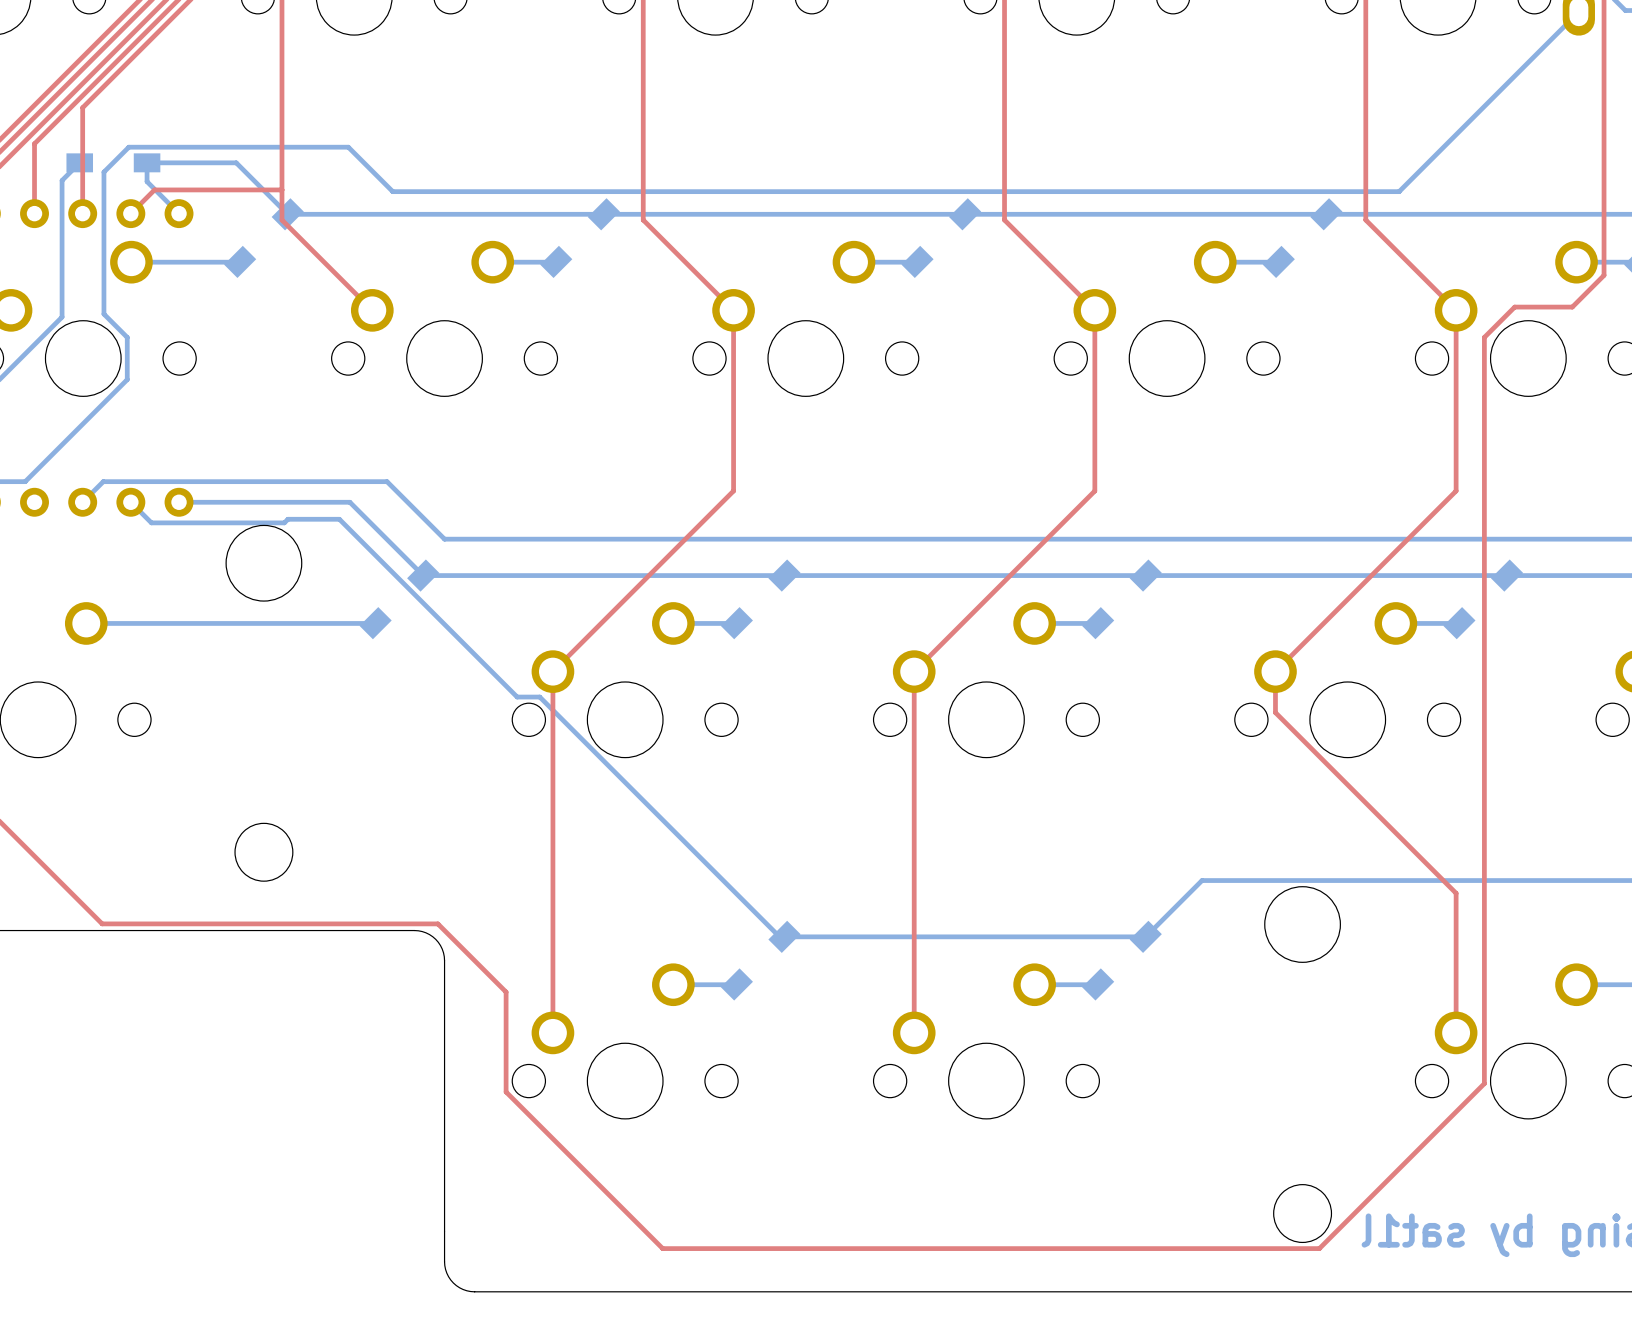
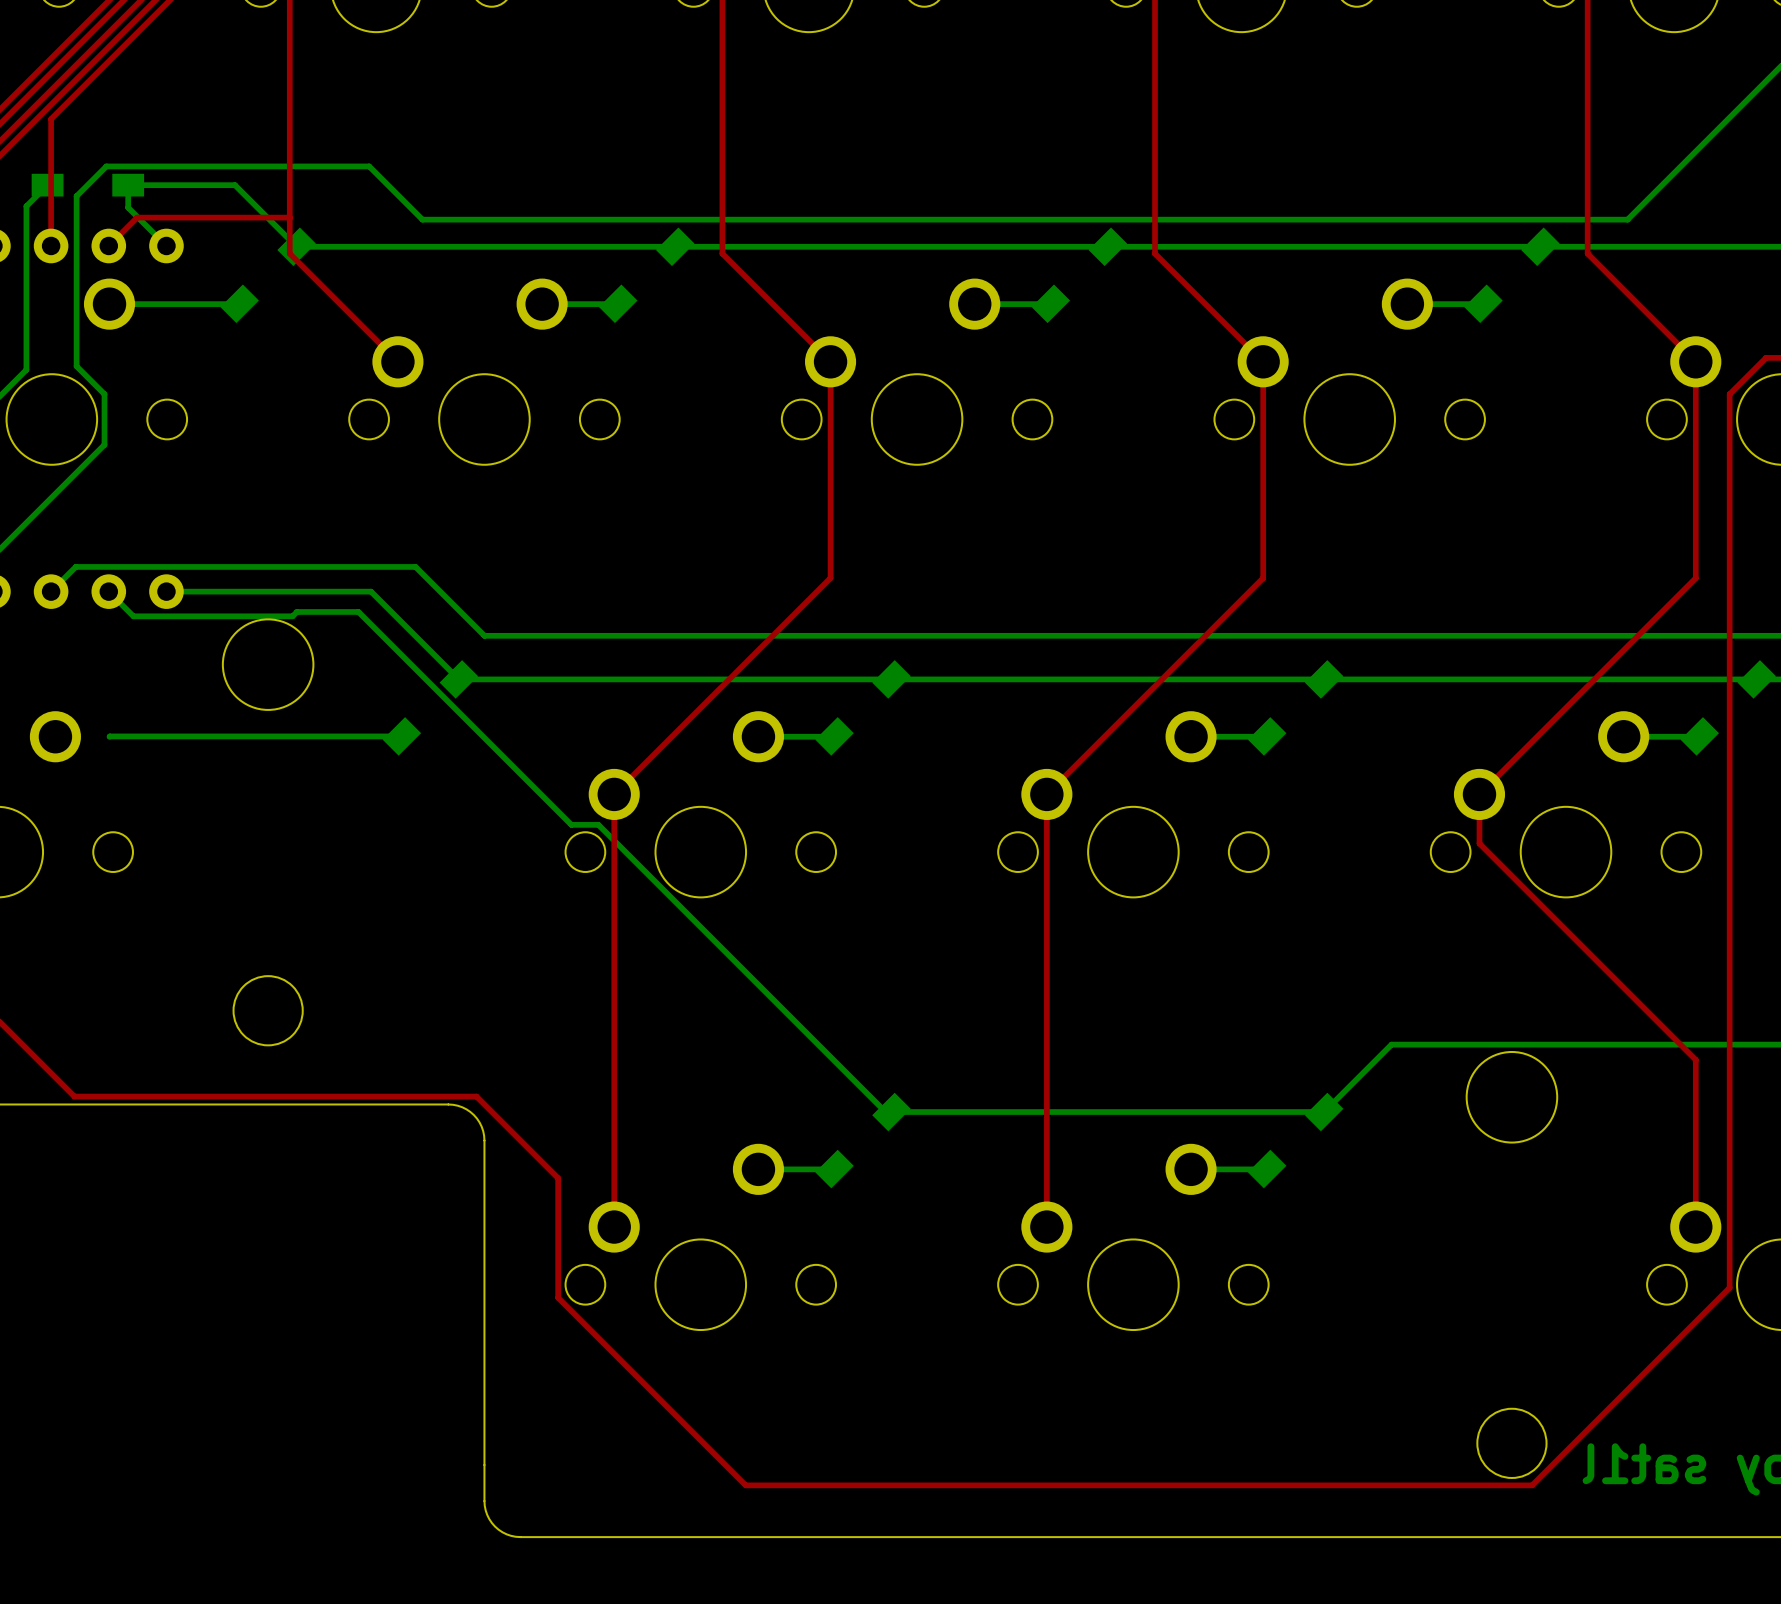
bottom track: (375, 623) (86, 623) -> (401, 736) (109, 736)

